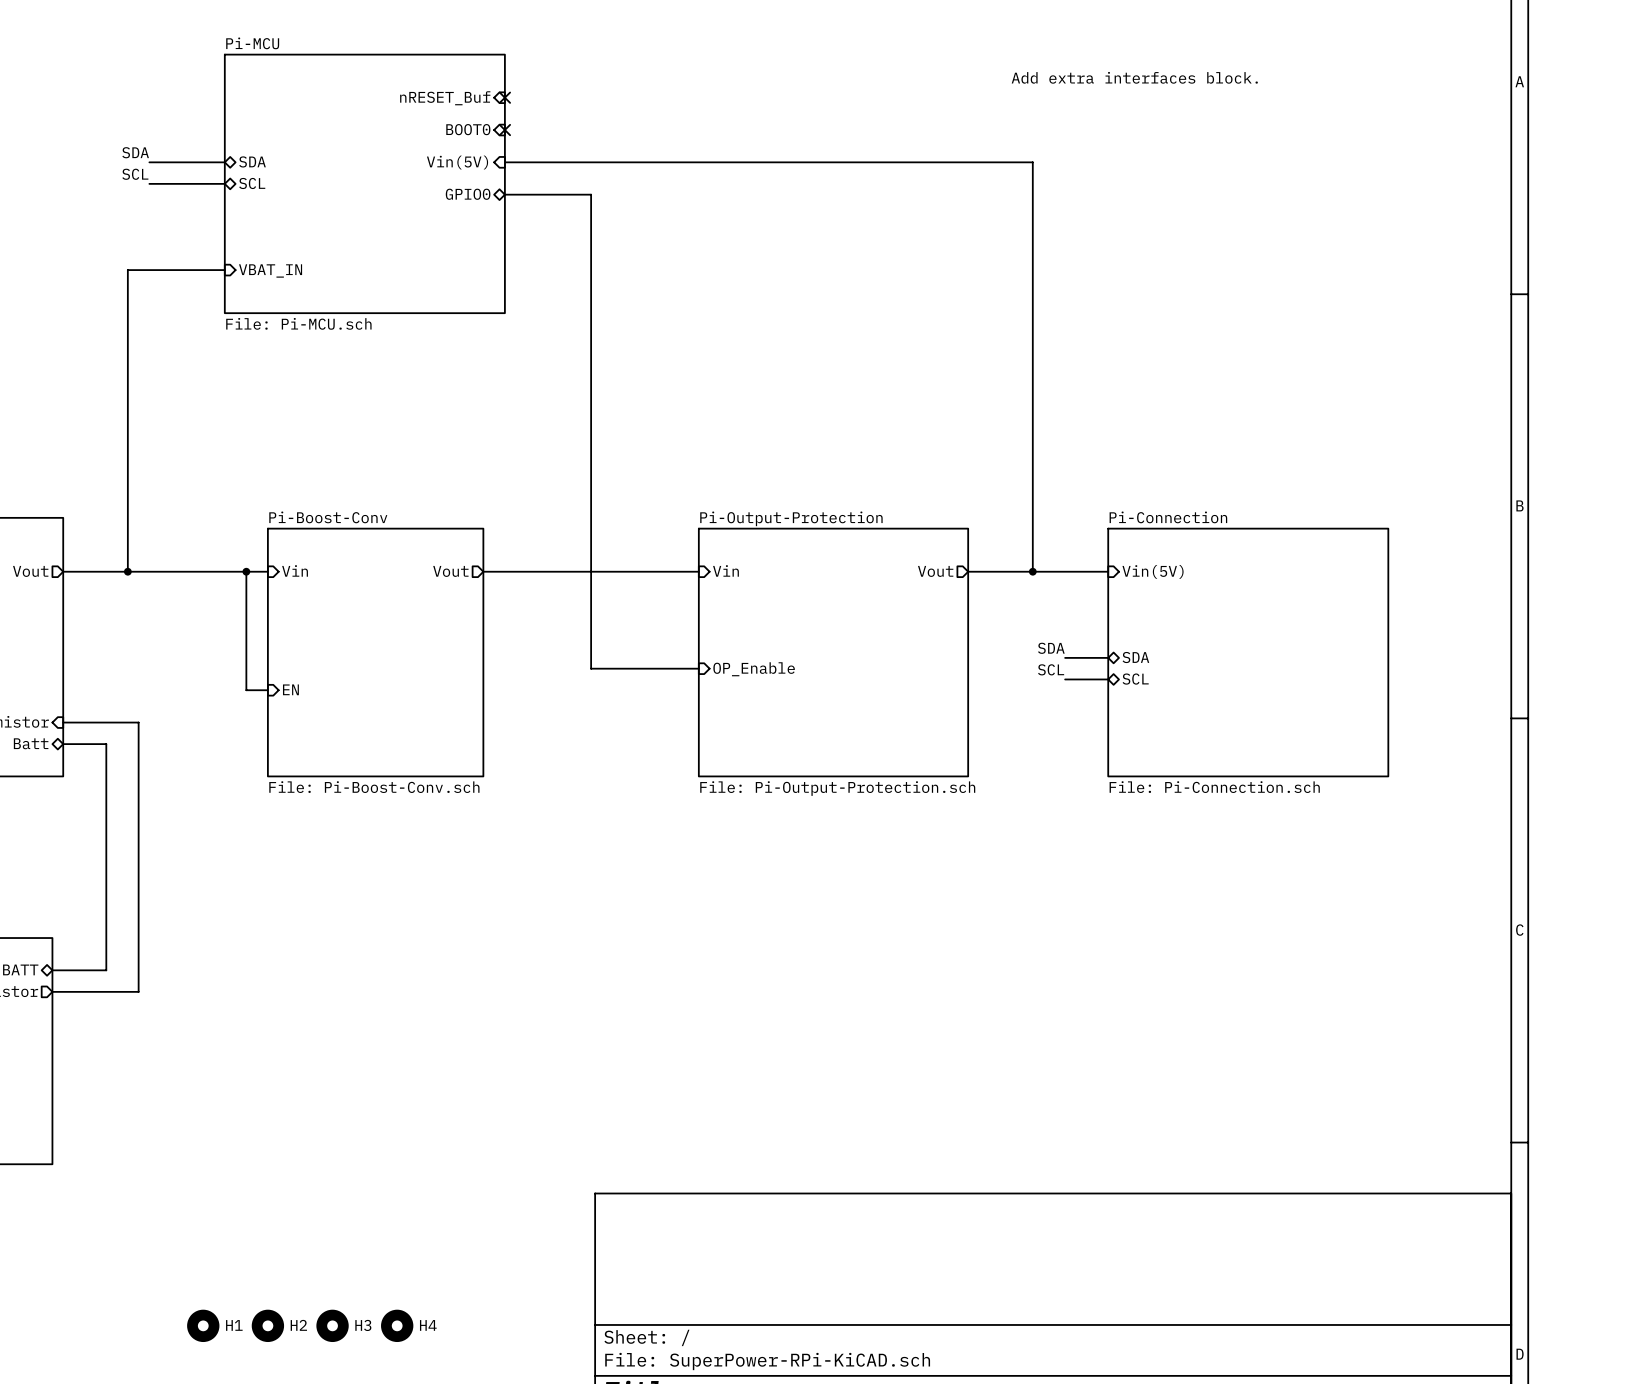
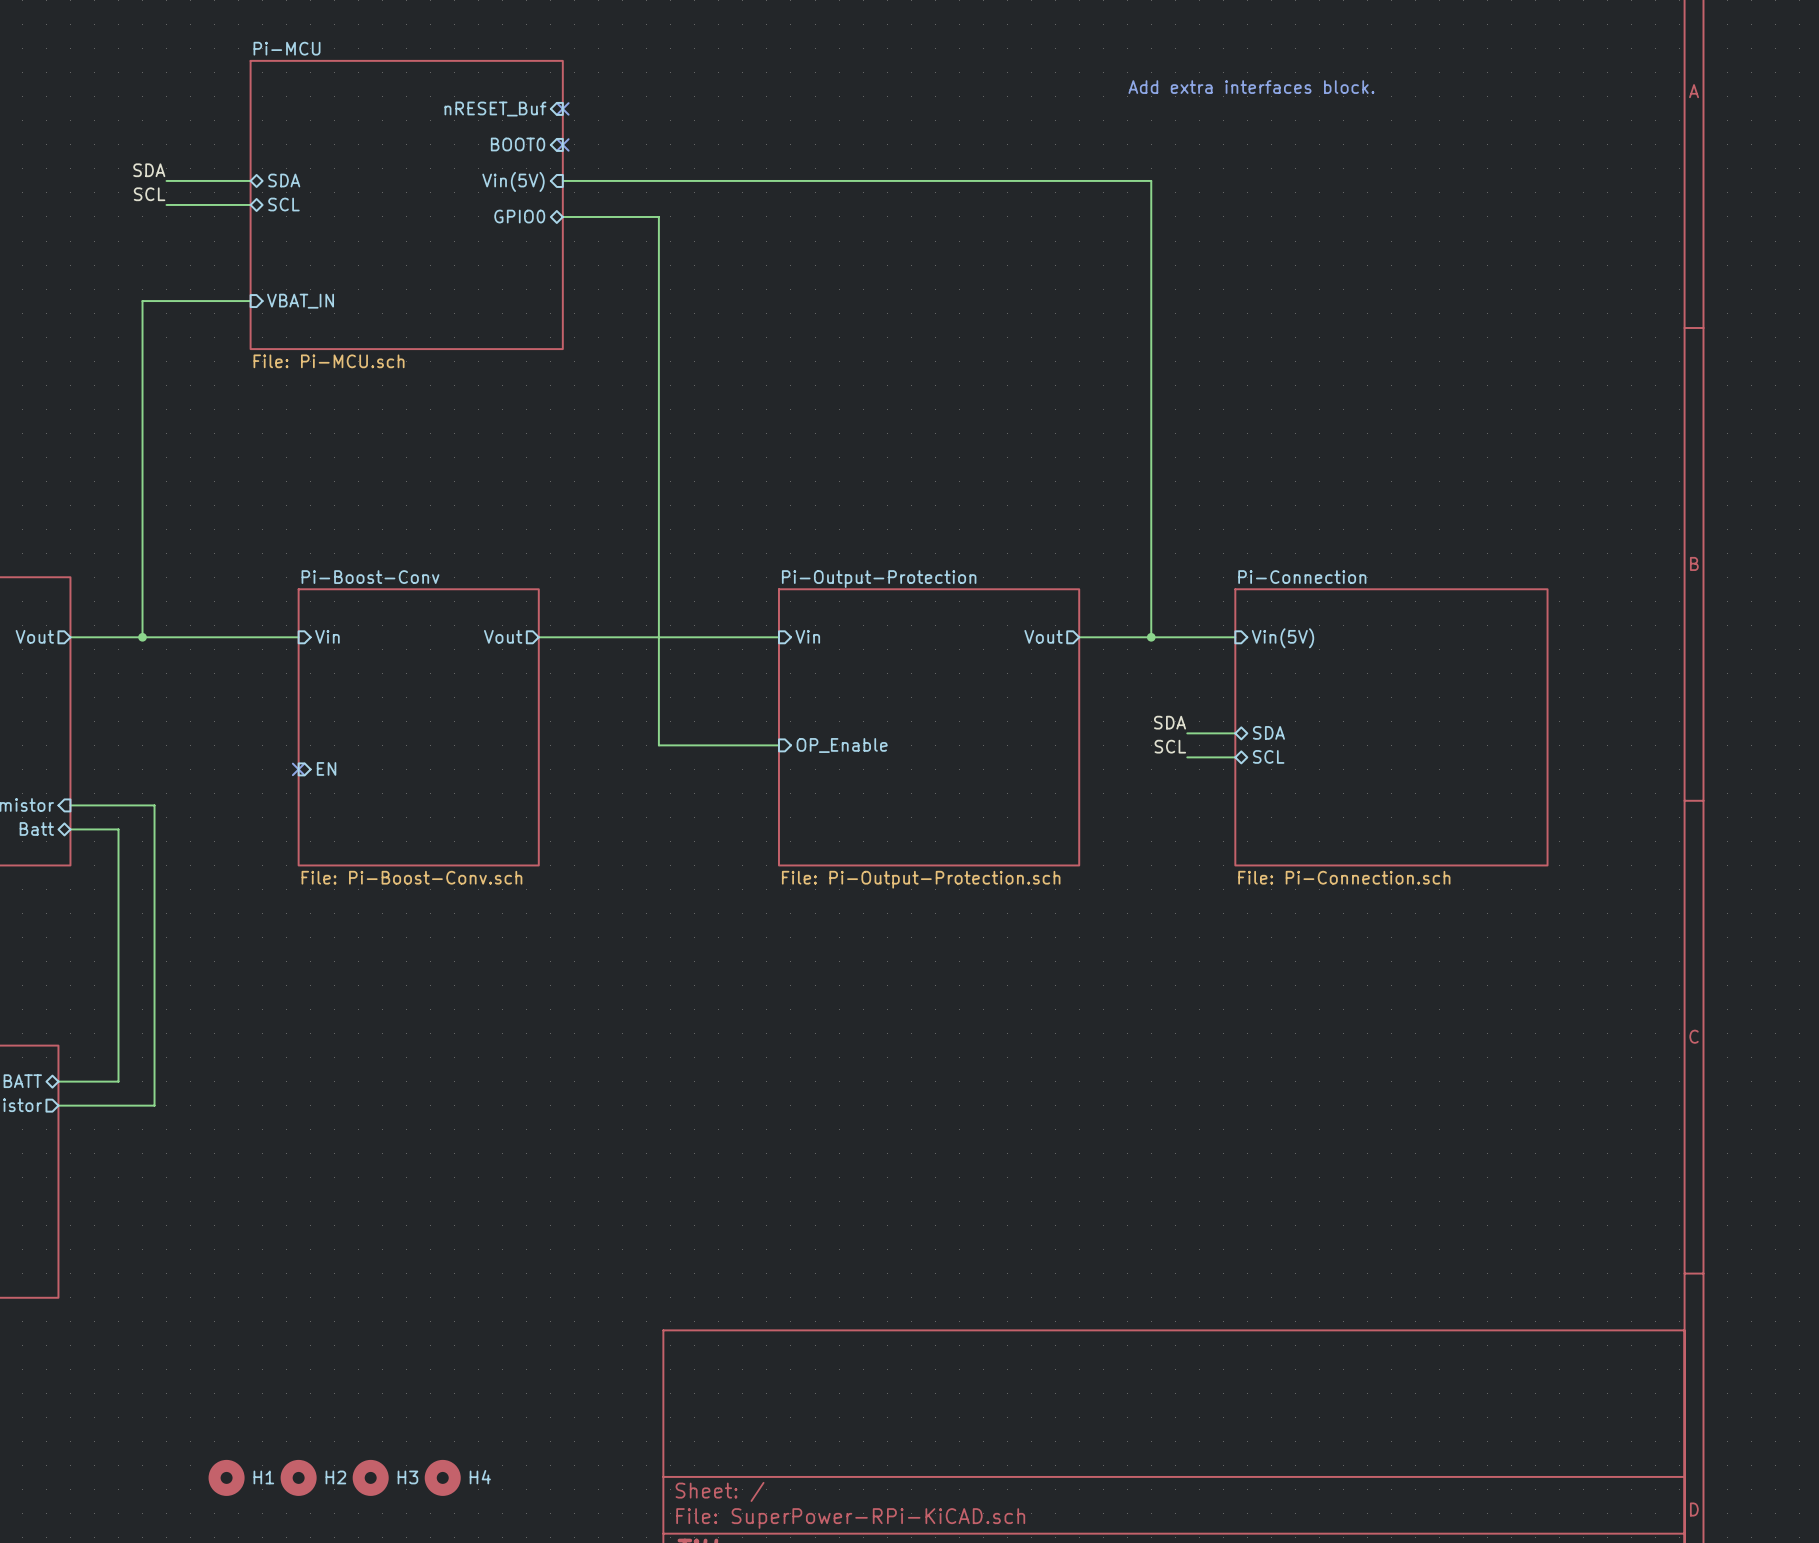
wire: (246, 571) (246, 690) (267, 690) -> none
junction: (246, 571) -> none
no-connect mark: none -> (298, 769)

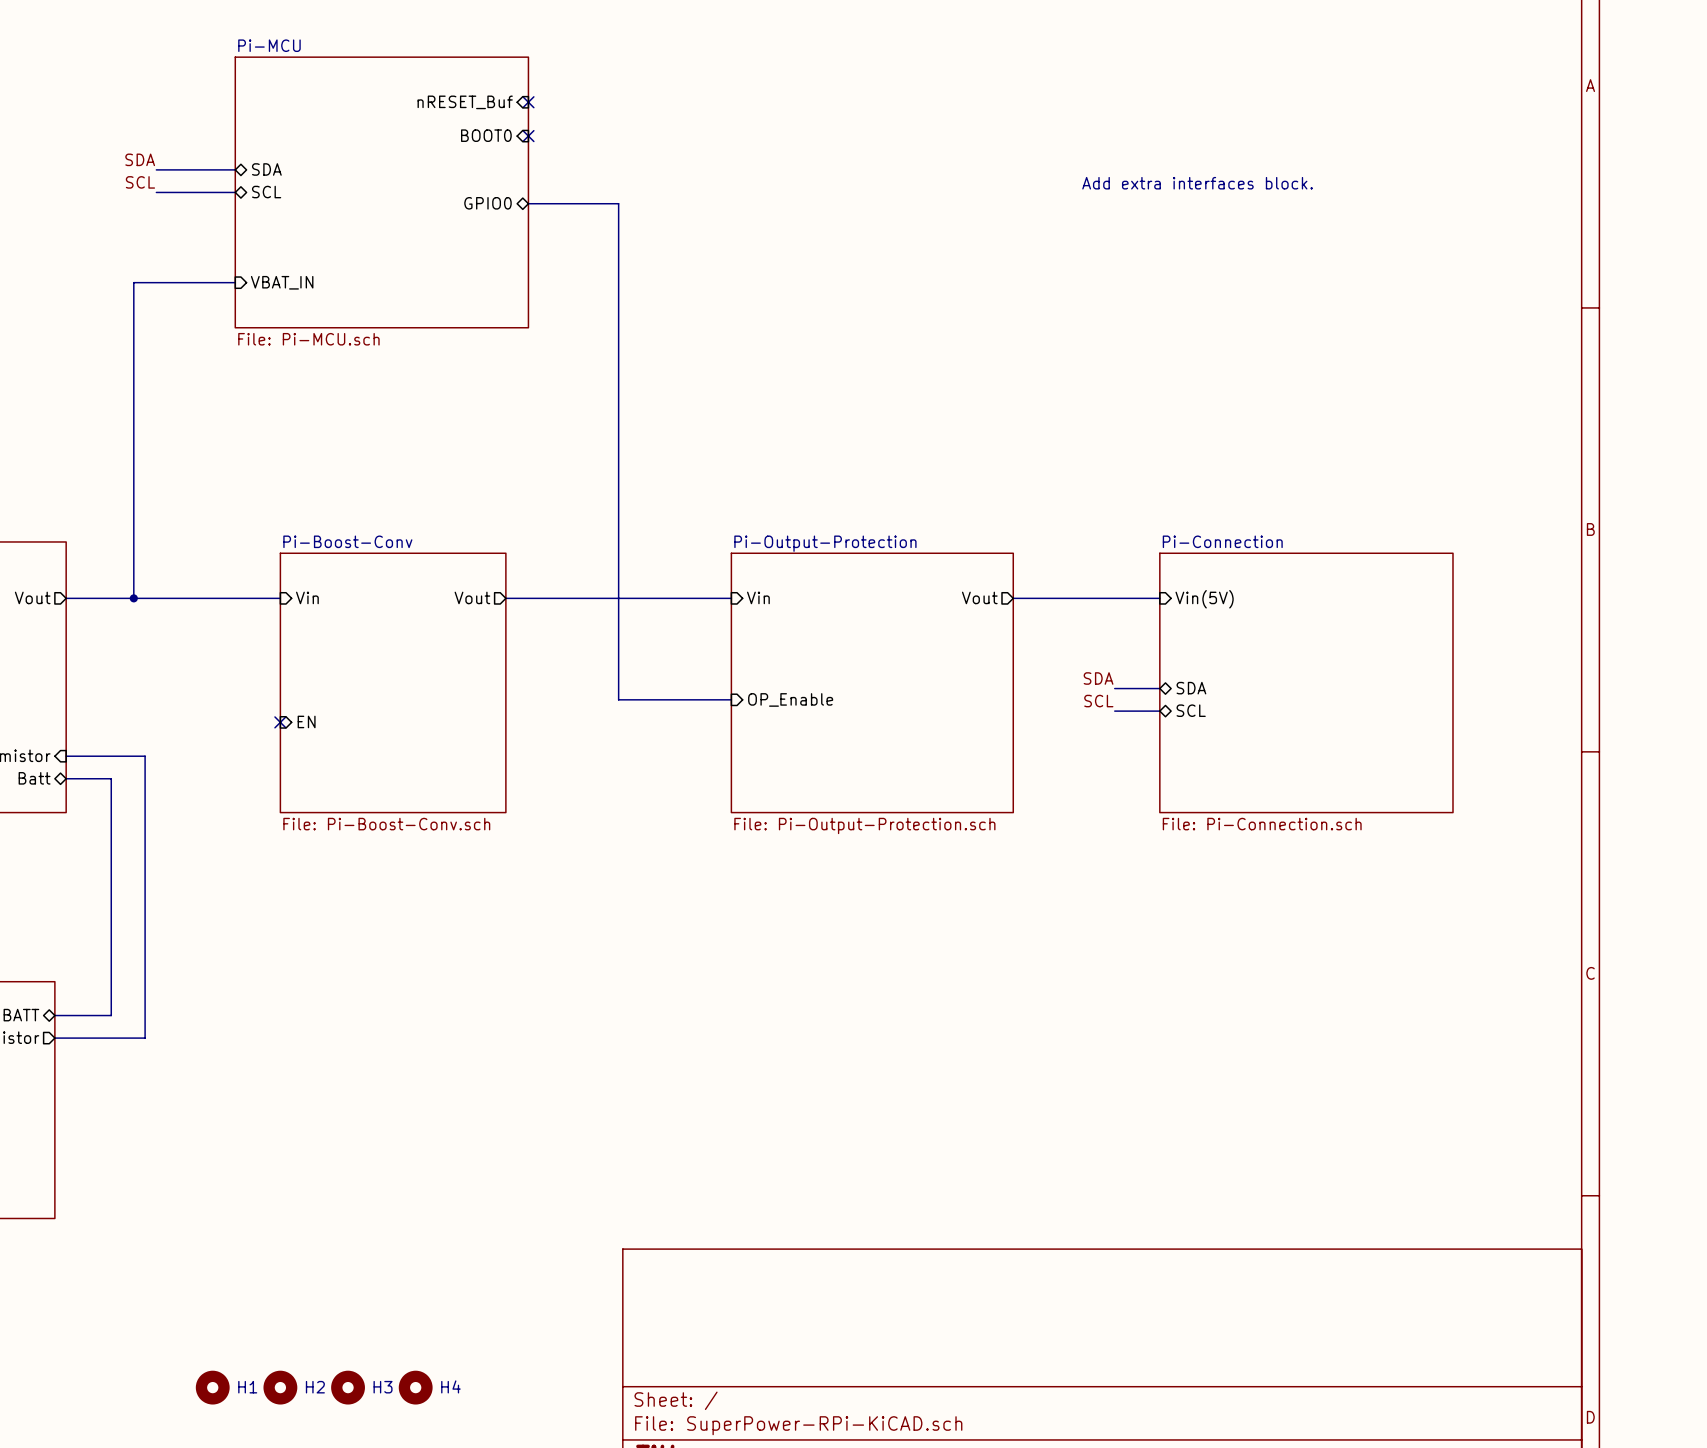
text position: Add extra interfaces block. (1251, 87) -> Add extra interfaces block. (1197, 183)
wire: (562, 180) (1151, 180) (1151, 637) -> none
sheet pin: Vin(5V) (513, 181) -> none
junction: (1151, 637) -> none

